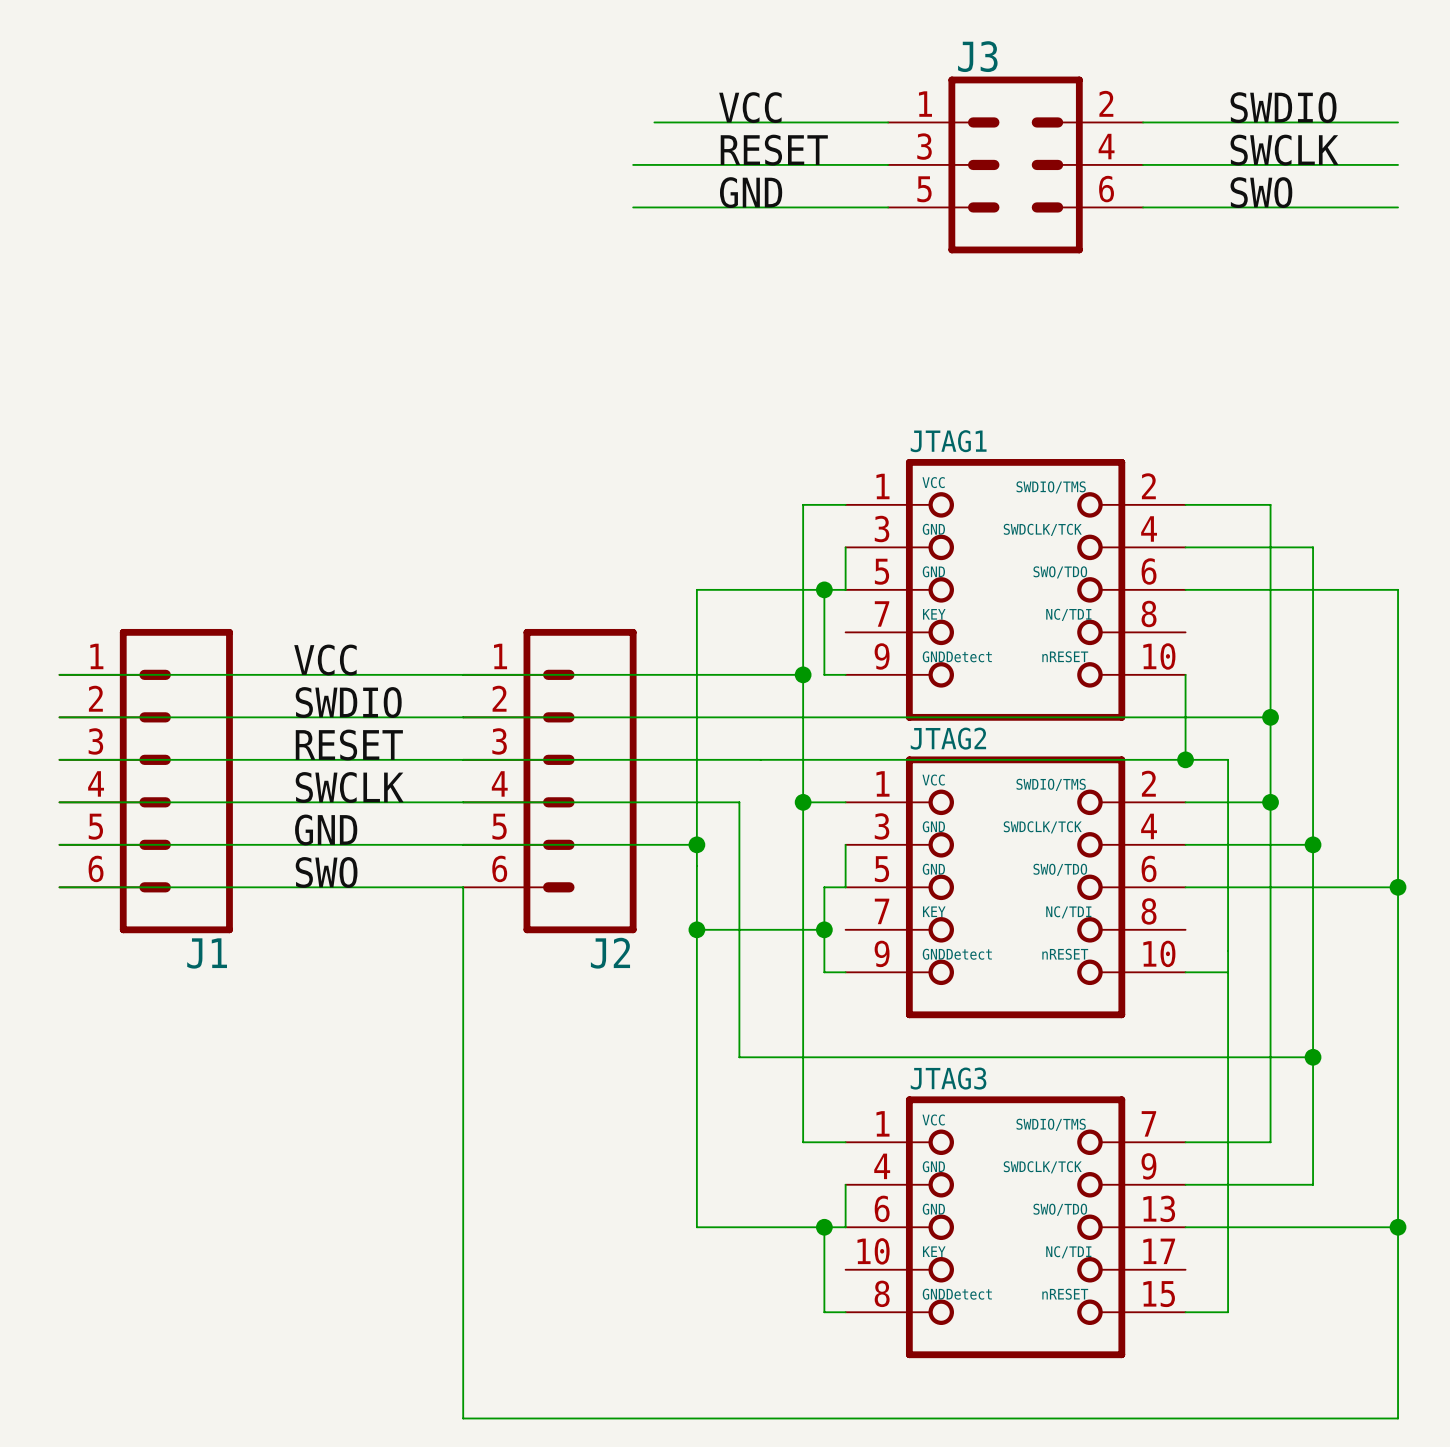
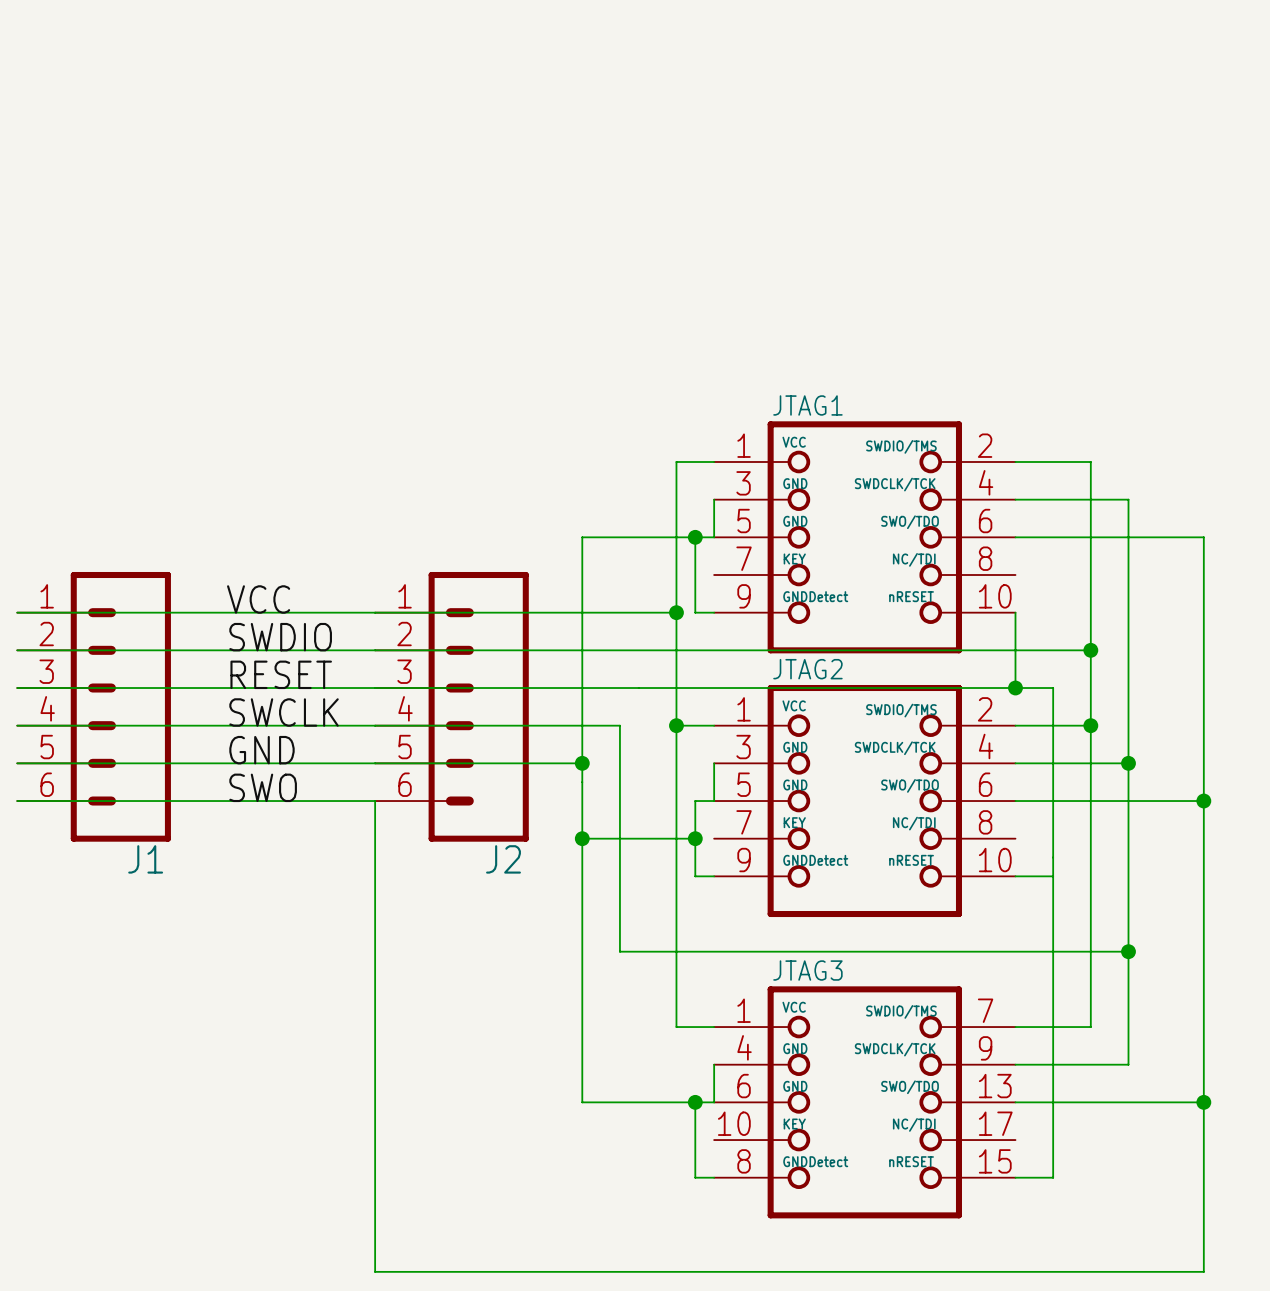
label: VCC (750, 107) -> none
label: SWDIO (1283, 107) -> none
wire: (654, 122) (888, 122) -> none
wire: (1143, 122) (1398, 122) -> none
label: RESET (774, 150) -> none
label: SWCLK (1284, 150) -> none
wire: (633, 164) (888, 164) -> none
J3: (1015, 164) -> none
wire: (1143, 164) (1398, 164) -> none
label: GND (751, 192) -> none
label: SWO (1261, 192) -> none
wire: (633, 207) (888, 207) -> none
wire: (1143, 207) (1398, 207) -> none

